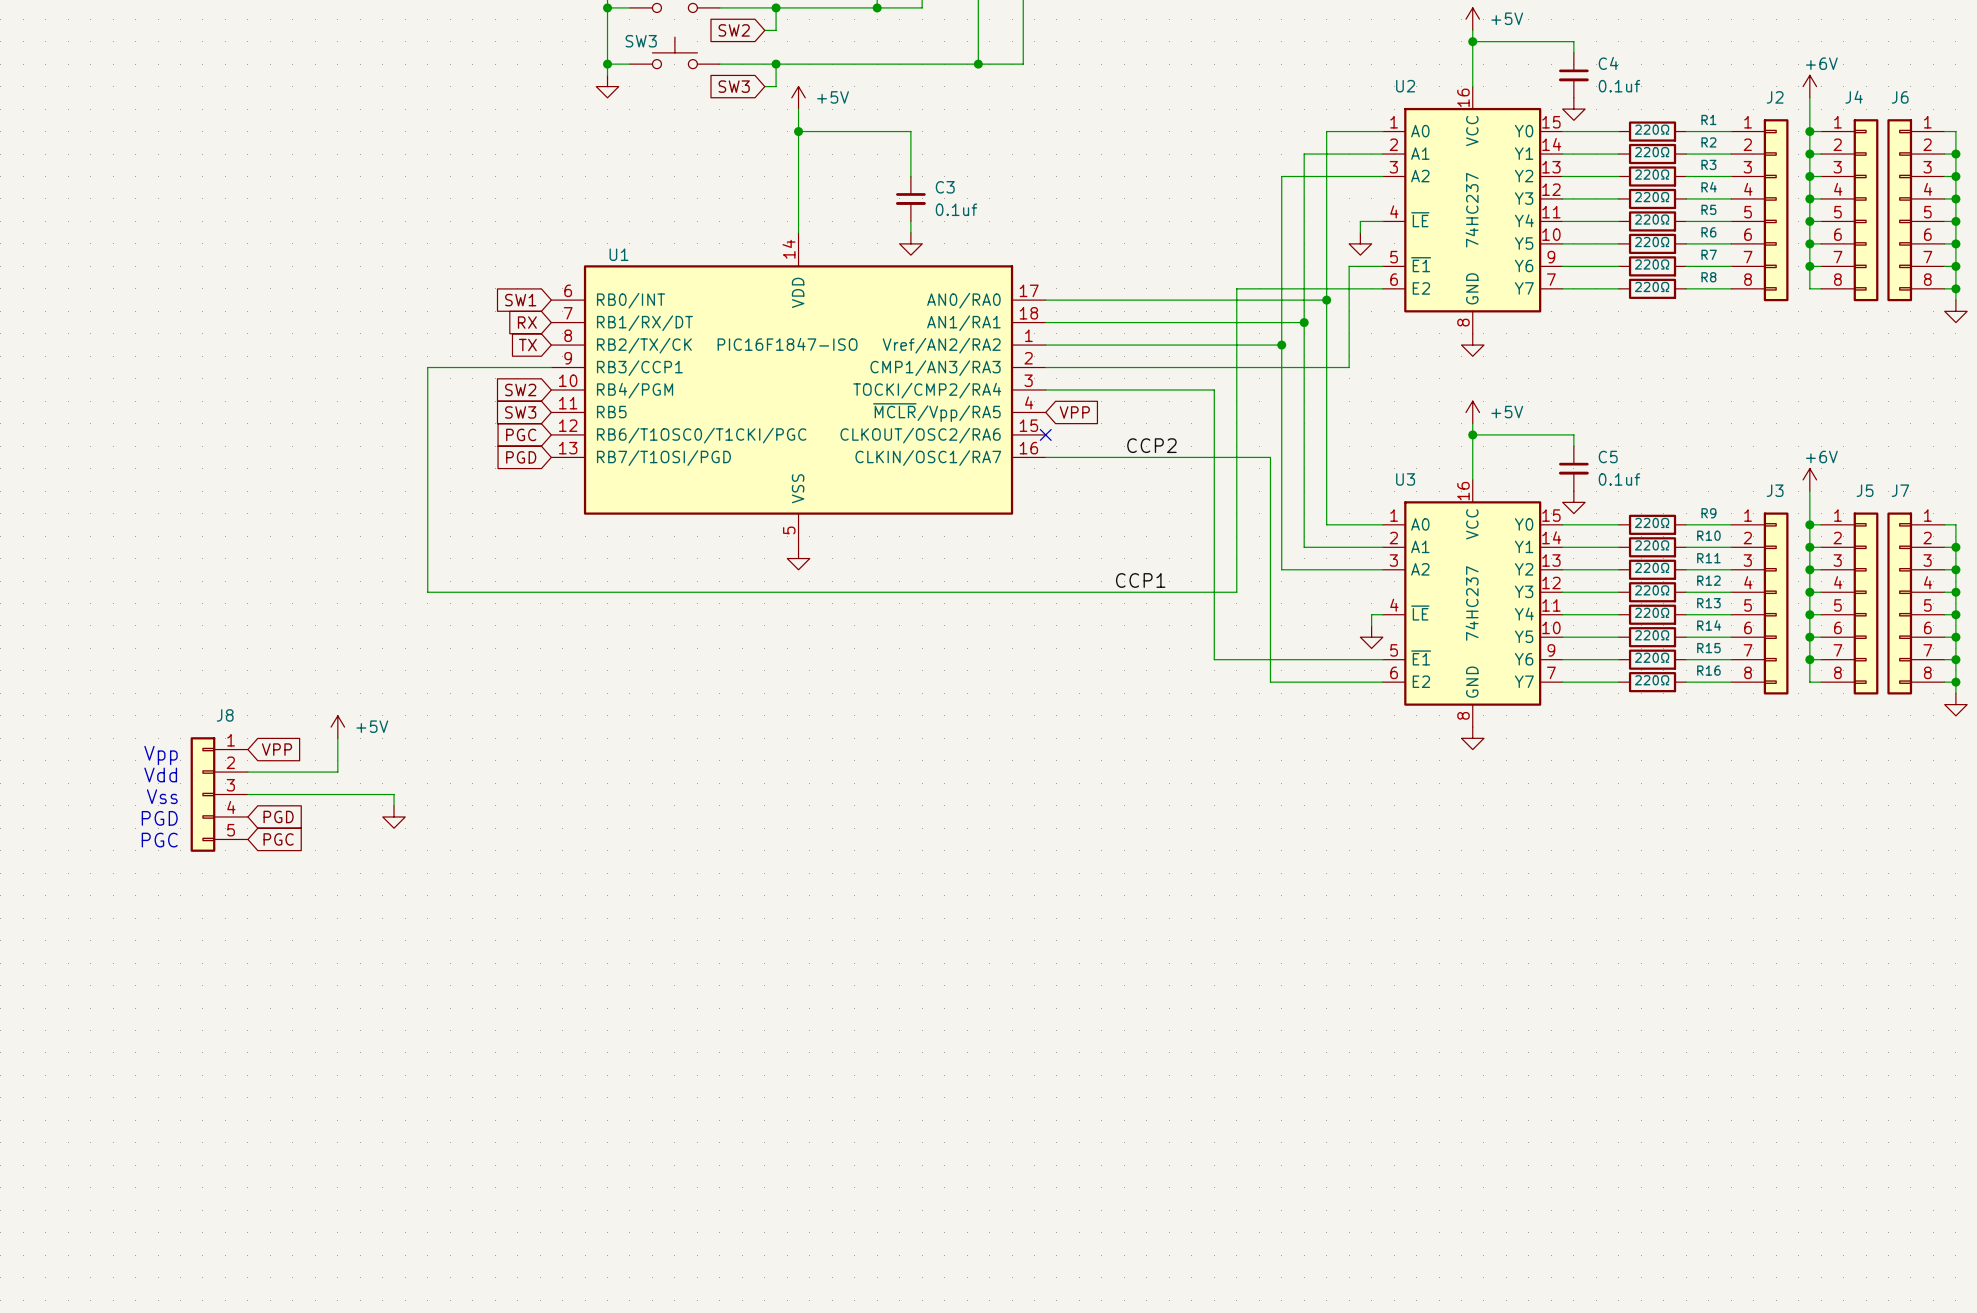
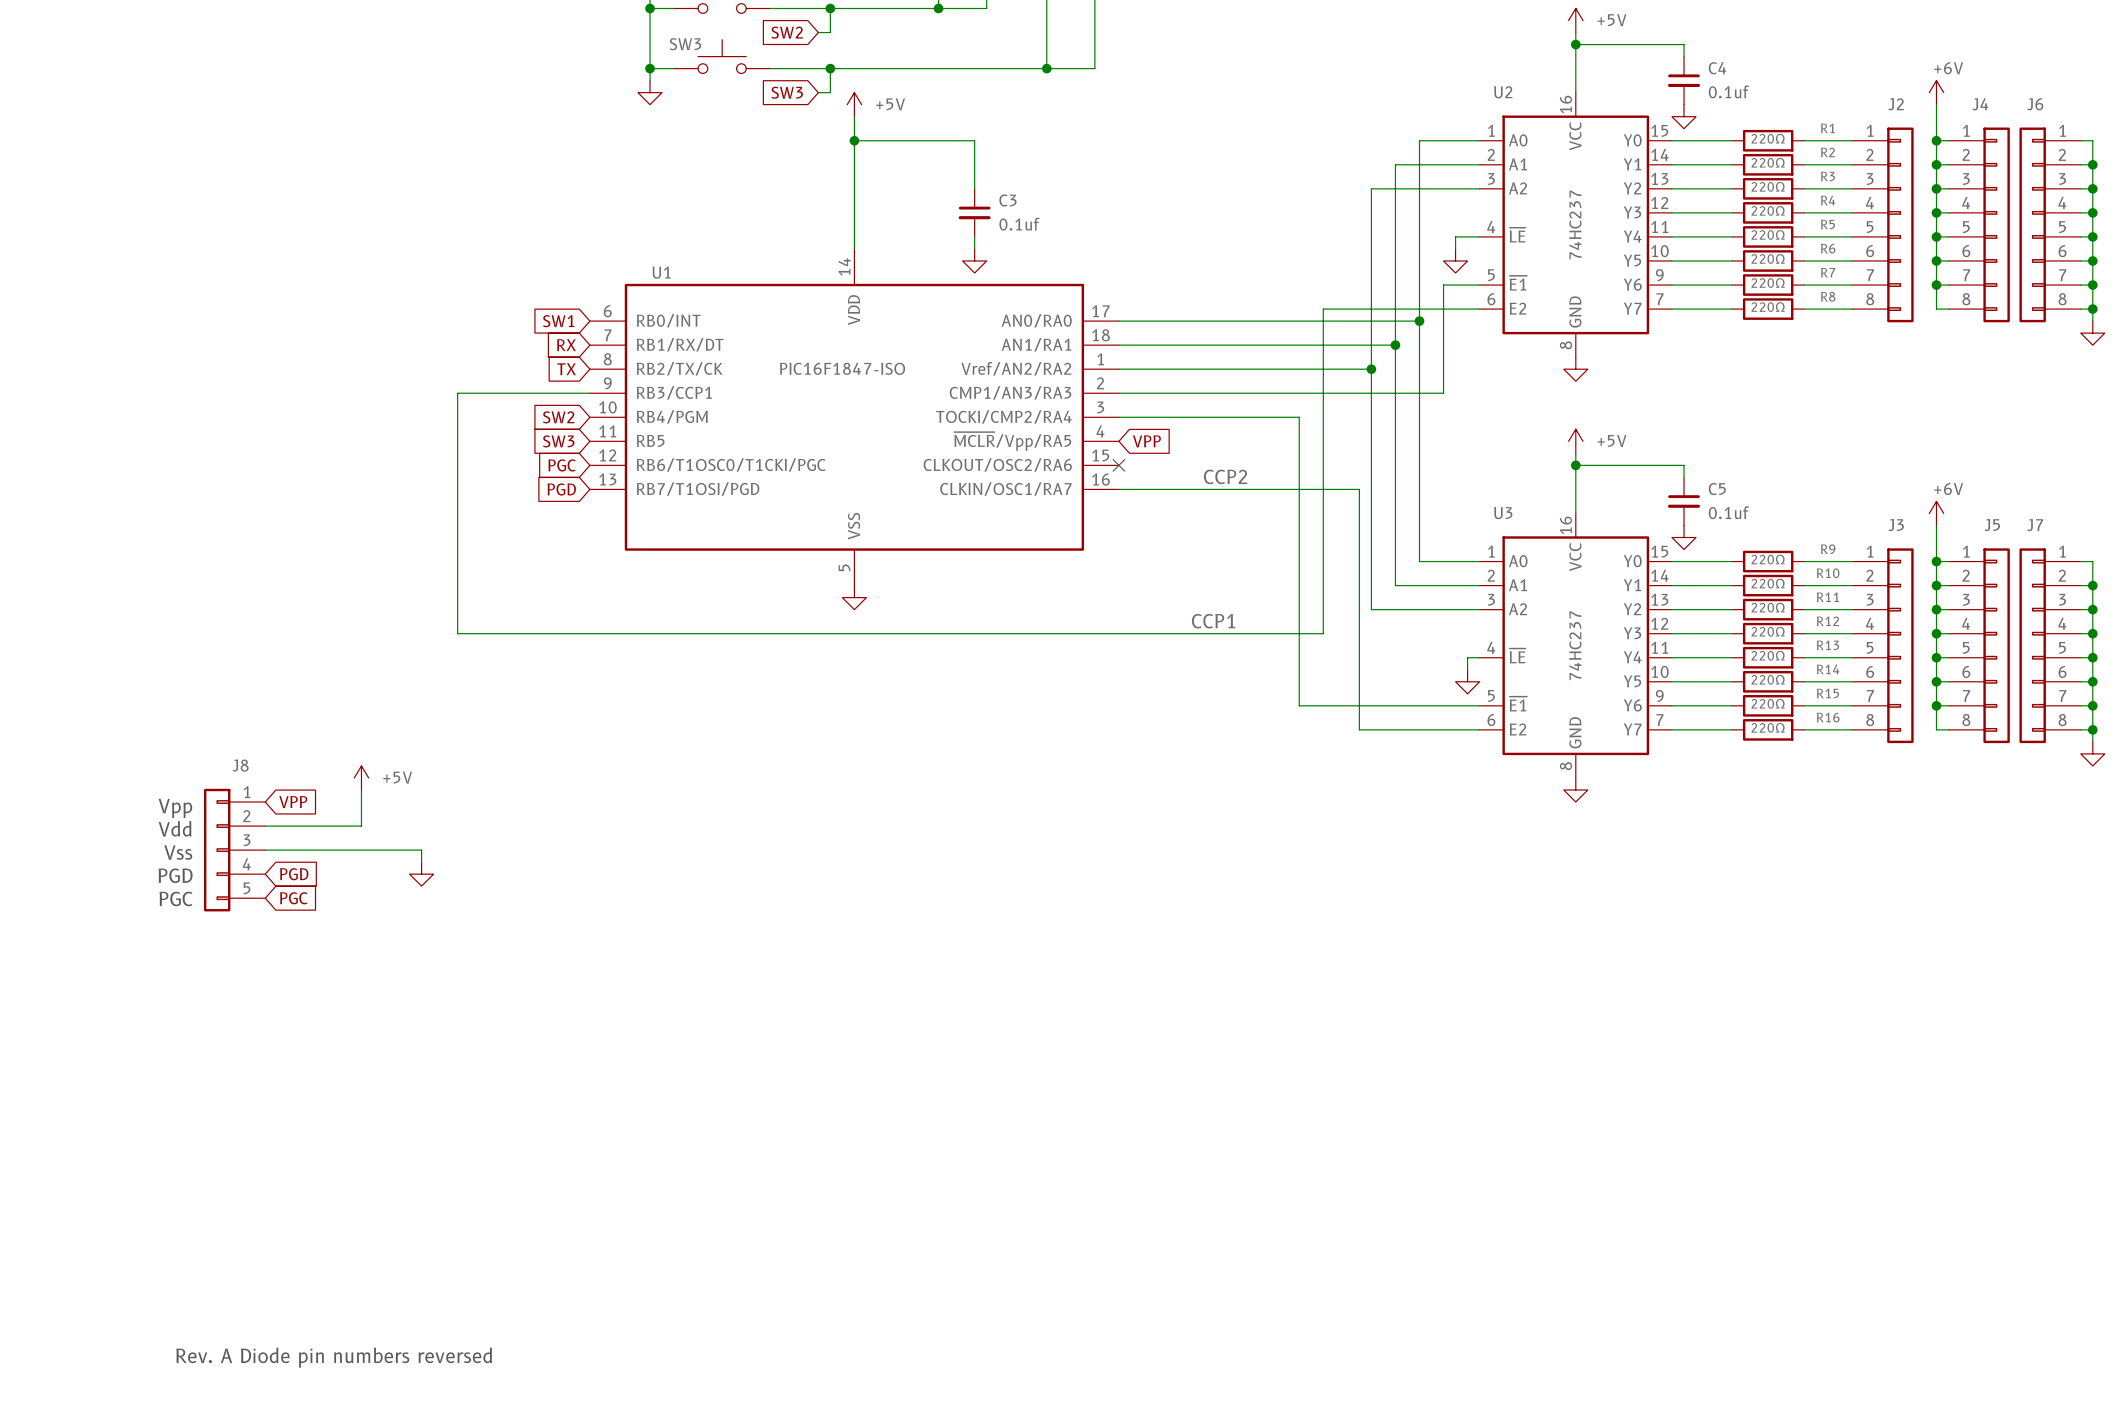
text: none -> Rev. A Diode pin numbers reversed (334, 1357)

